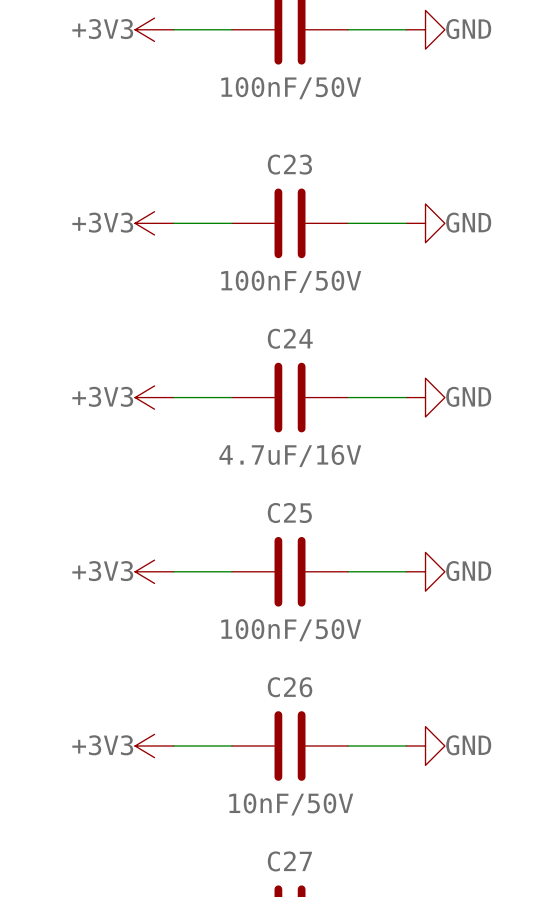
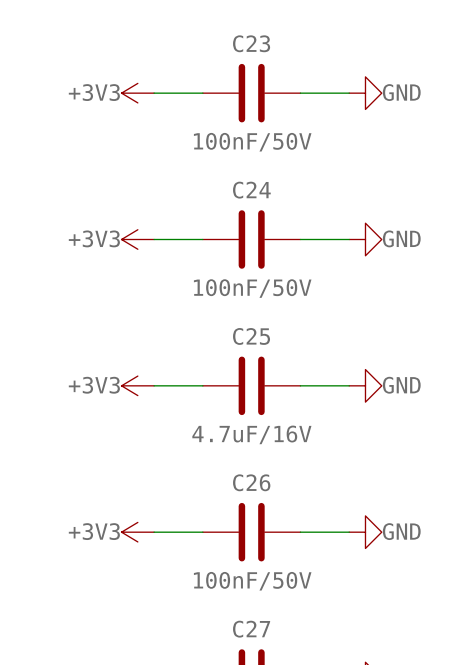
C24 value: 4.7uF/16V (290, 455) -> 100nF/50V (252, 288)
C25 value: 100nF/50V (291, 630) -> 4.7uF/16V (251, 434)
C26 value: 10nF/50V (291, 804) -> 100nF/50V (252, 581)

